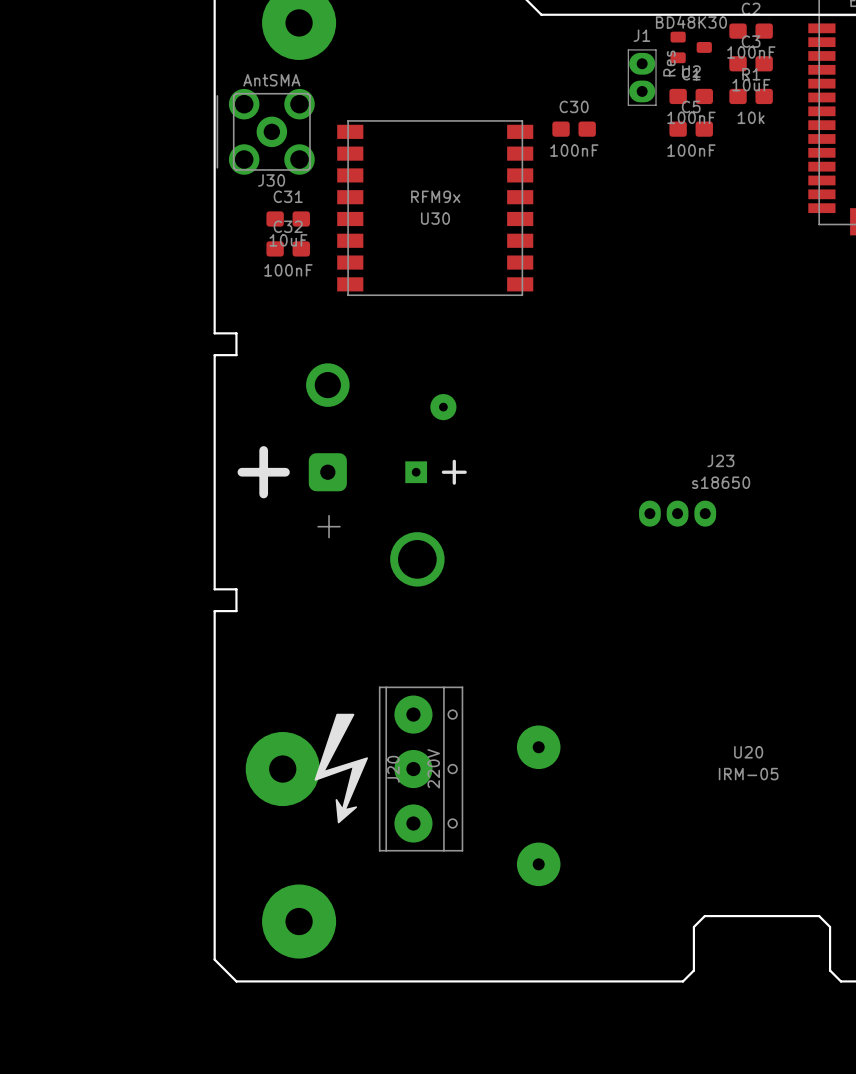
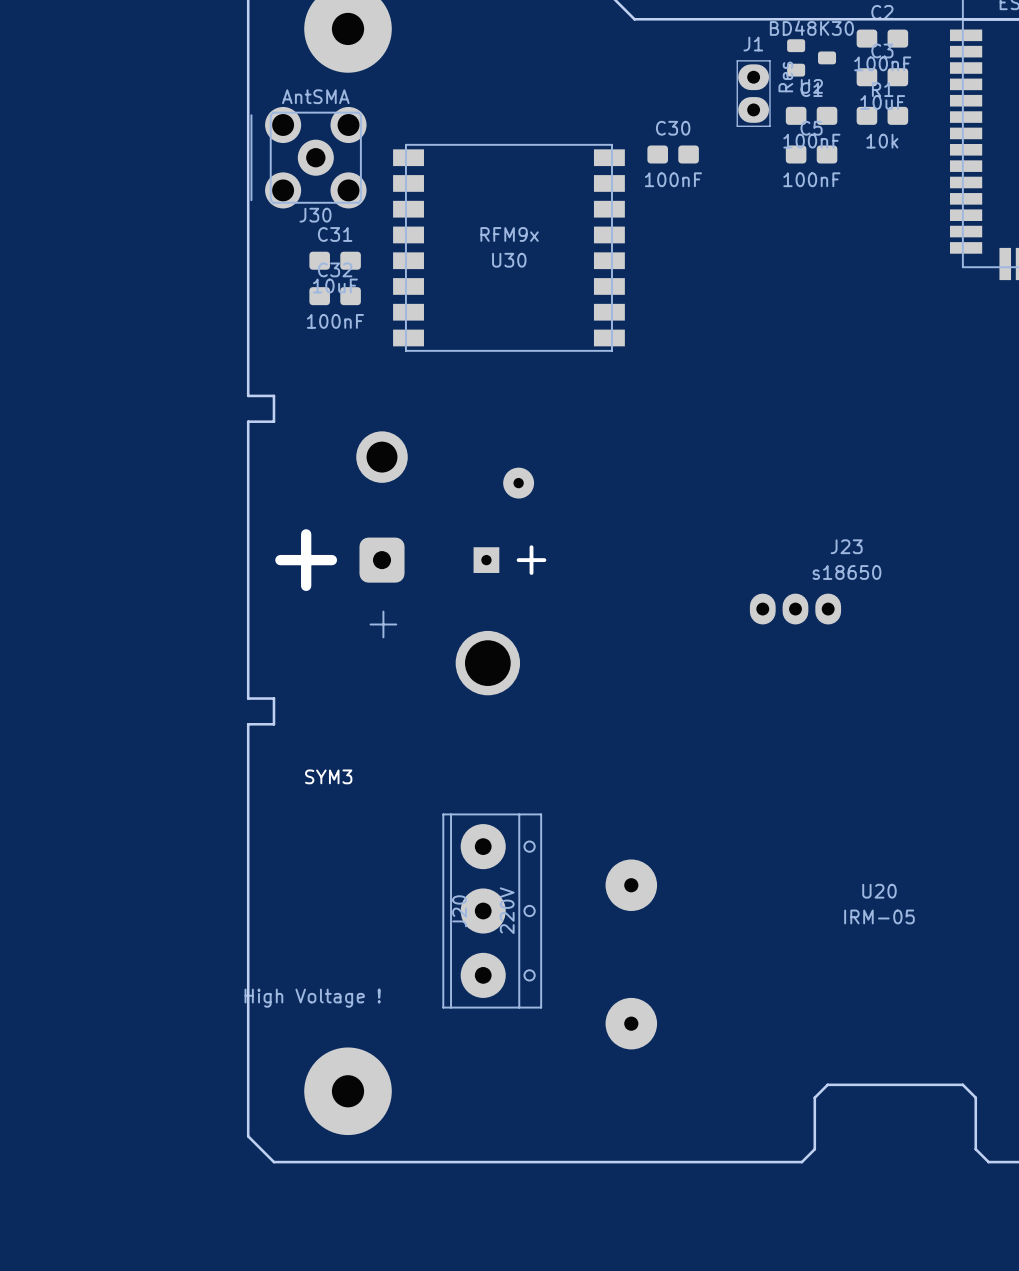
drawing: [314, 713, 368, 824] -> none
SYM3: none -> High Voltage ! (312, 888)
part: (282, 769) -> none

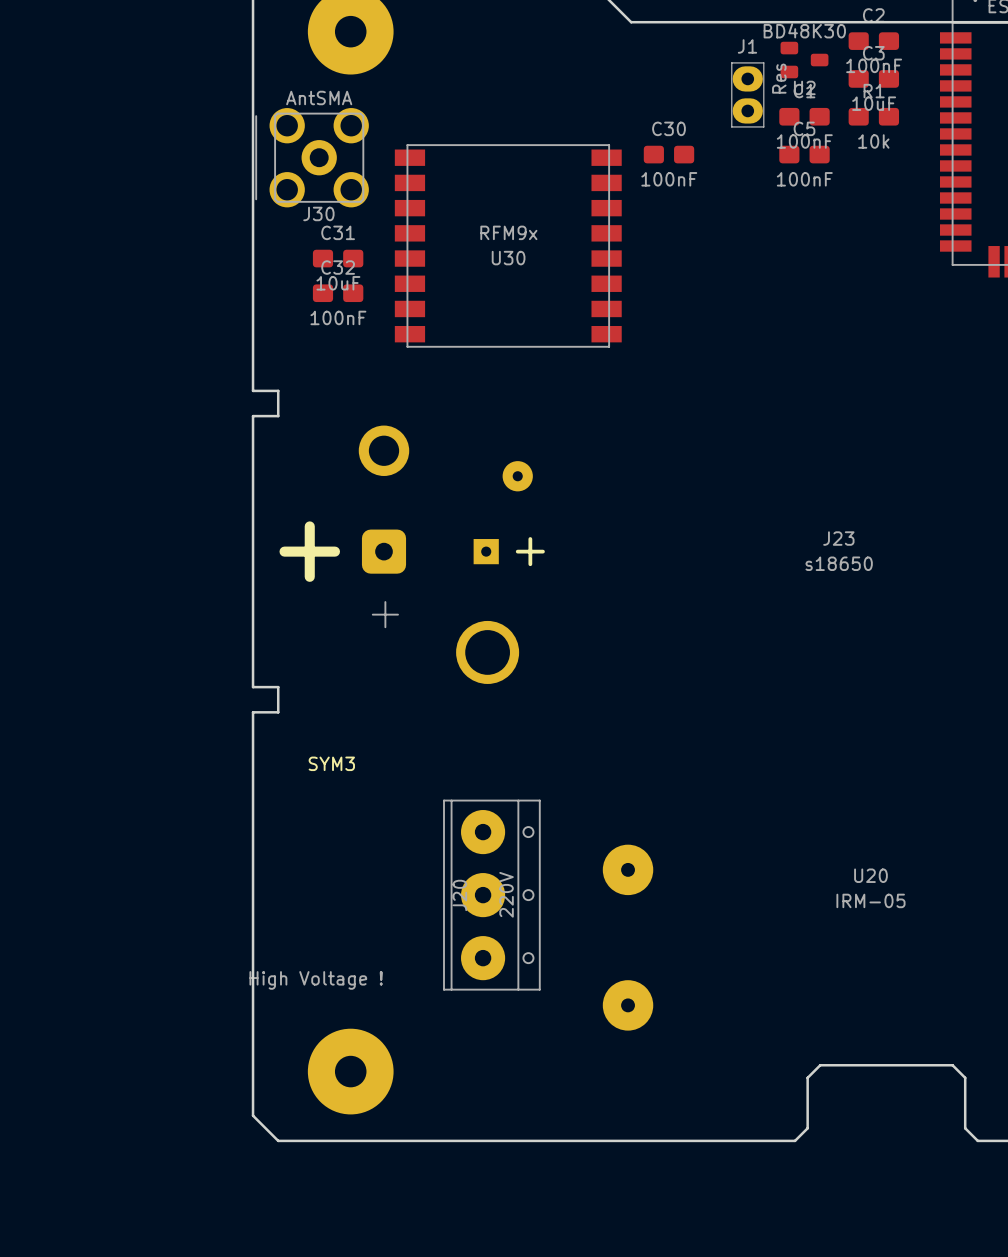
part: (795, 609) -> none

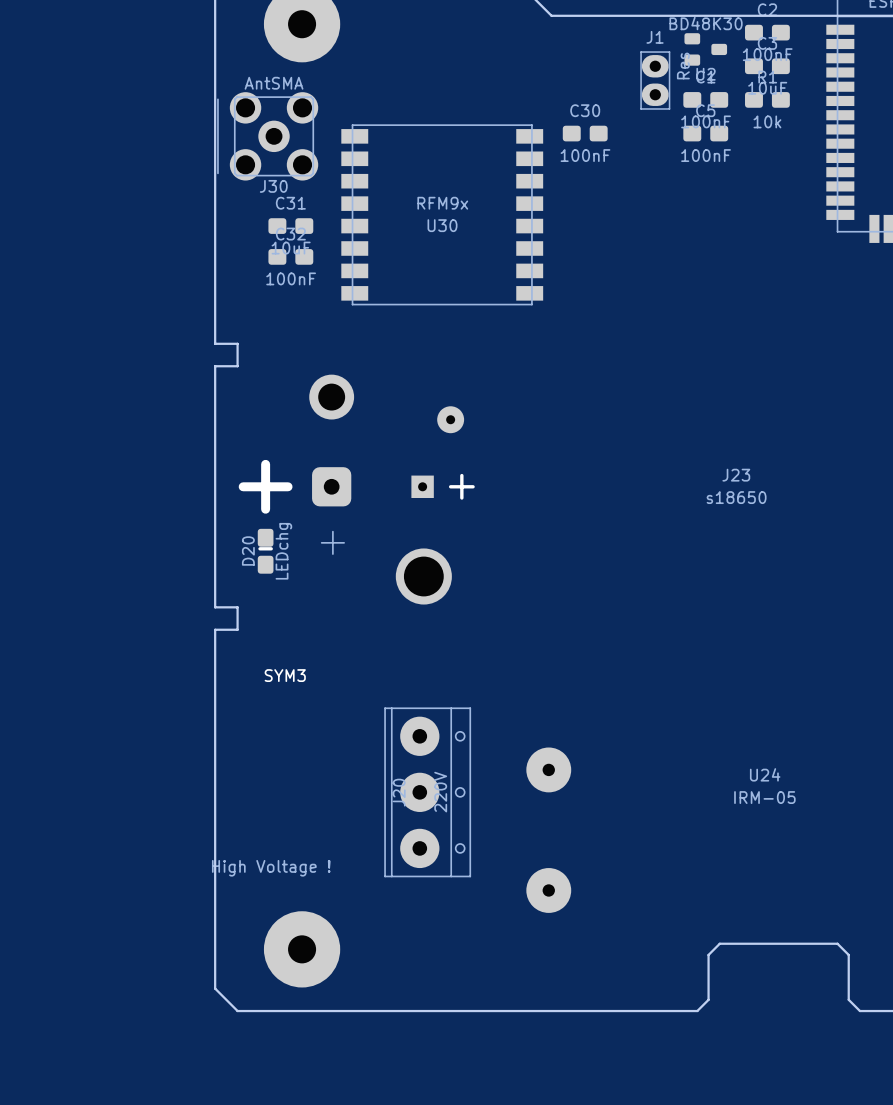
D20: none -> LEDchg (265, 551)
U20 name: U20 (870, 875) -> U24 (765, 774)

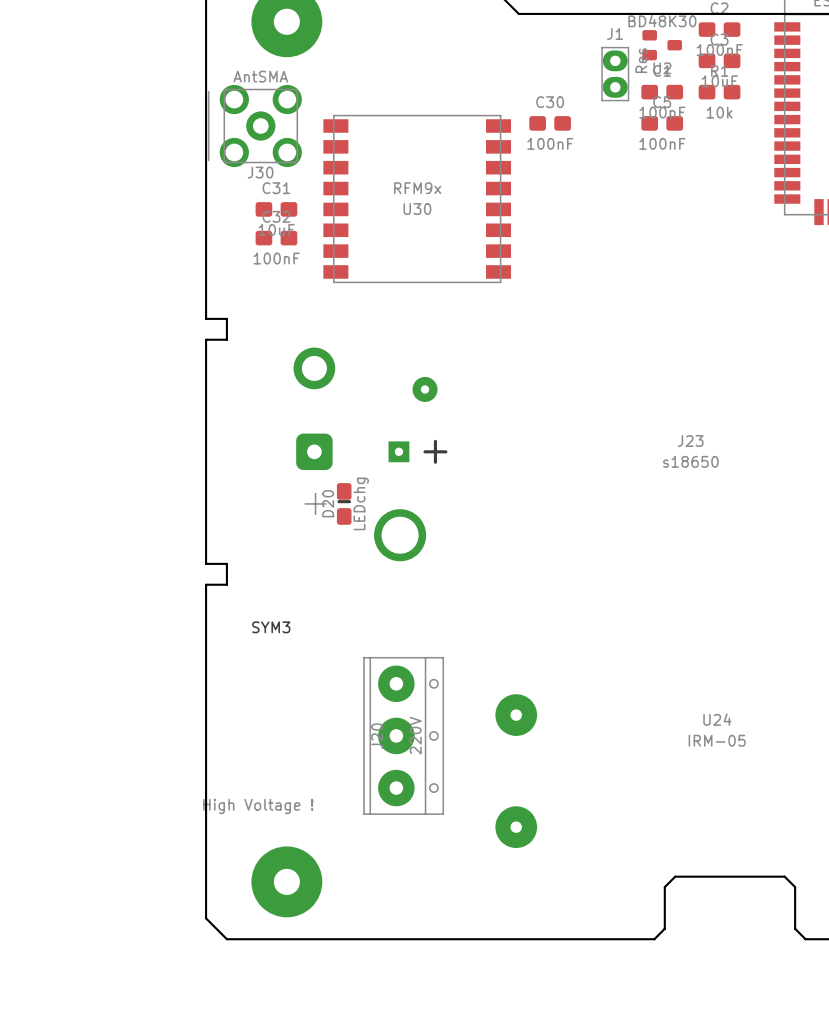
line: (265, 464) (265, 509) -> none
line: (243, 486) (288, 486) -> none
D20 position: (265, 551) -> (344, 503)

